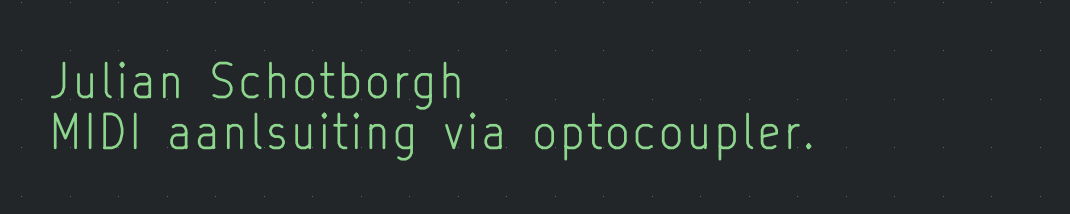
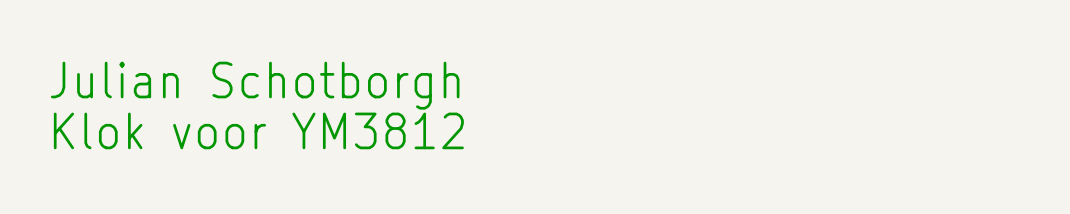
text: MIDI aanlsuiting via optocoupler. (432, 136) -> Klok voor YM3812 (258, 130)

